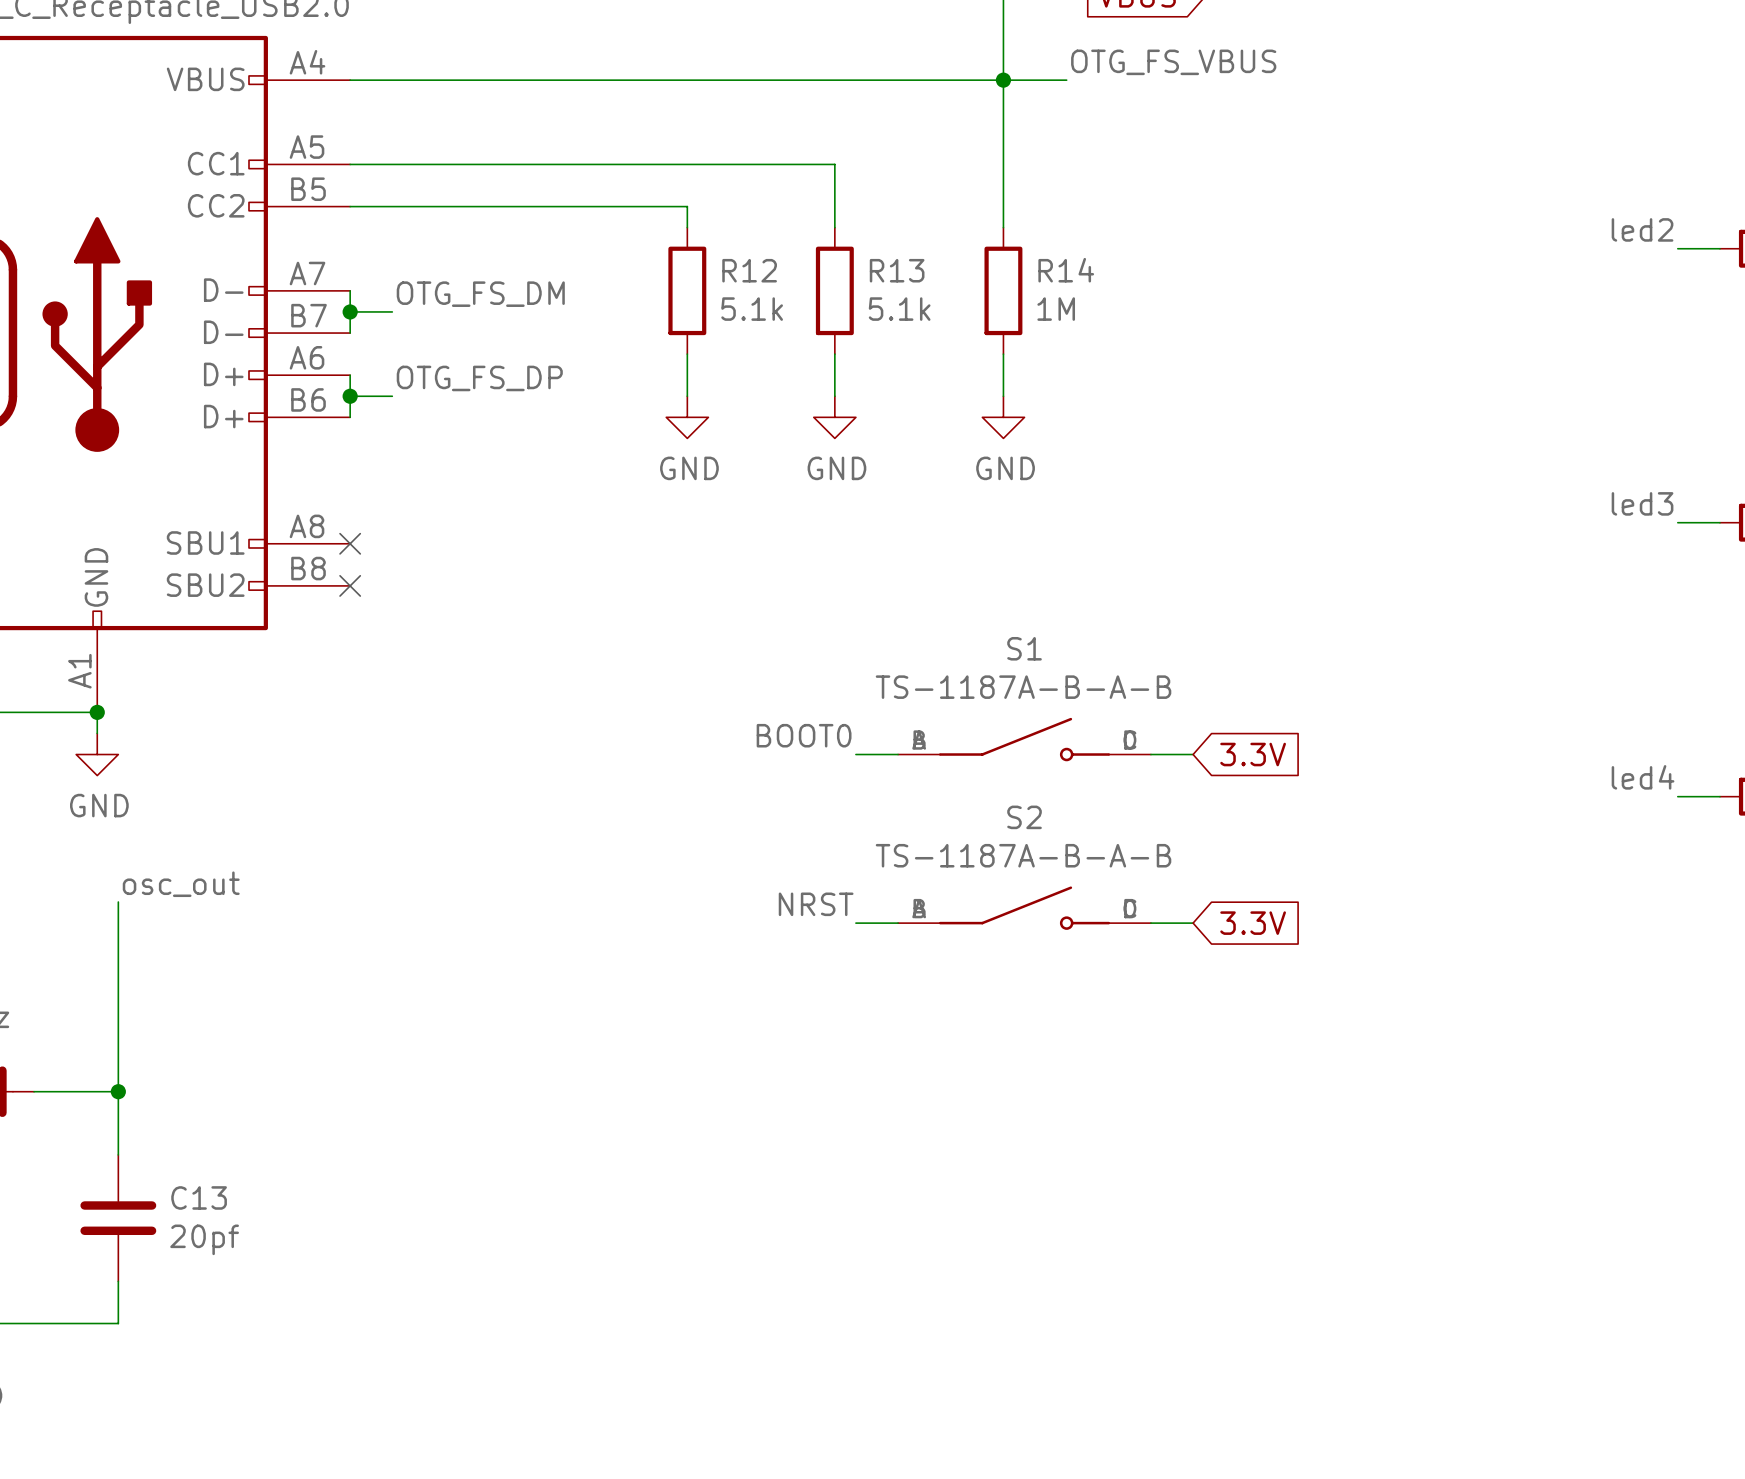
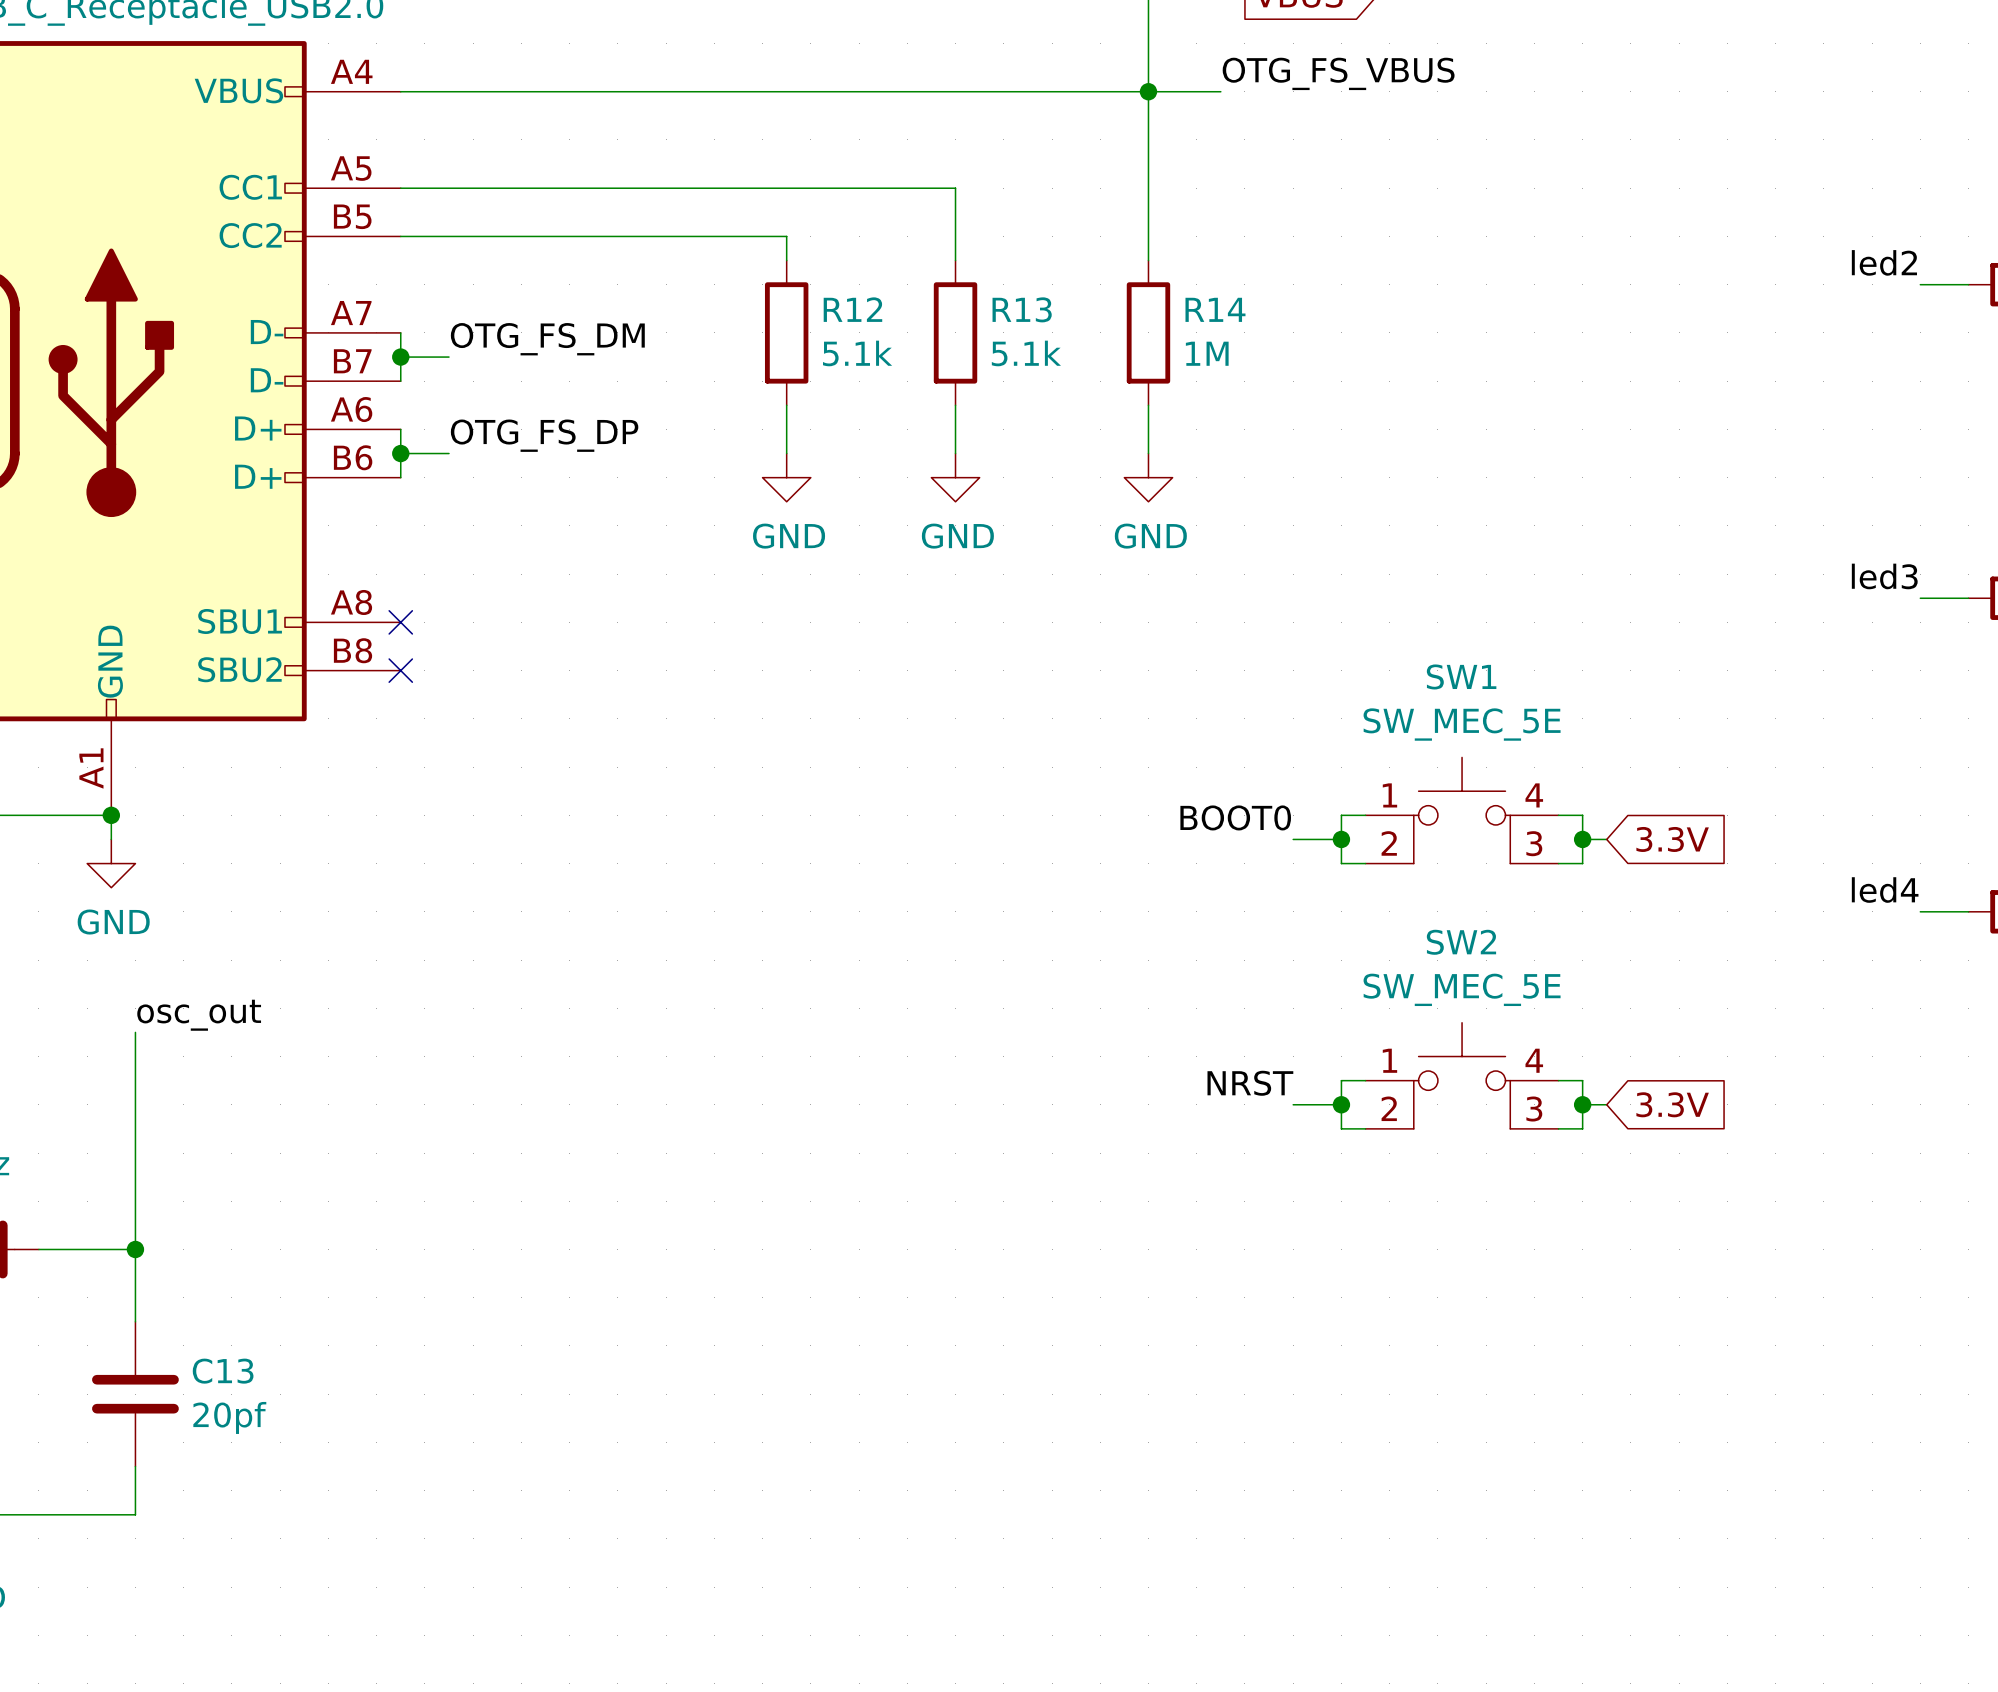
SW1: none -> SW_MEC_5E (1462, 810)
wire: none -> (1558, 815) (1582, 815) (1582, 863) (1558, 863)
junction: none -> (1341, 839)
wire: none -> (1582, 839) (1606, 839)
junction: none -> (1582, 839)
global label: none -> 3.3V (1672, 839)
label position: BOOT0 (804, 735) -> BOOT0 (1235, 817)
S1: TS-1187A-B-A-B (1024, 739) -> none
wire: (855, 754) (898, 754) -> (1293, 839) (1341, 839)
wire: (1150, 754) (1172, 754) -> (1365, 815) (1341, 815) (1341, 863)
global label: 3.3V (1253, 754) -> none
label position: NRST (816, 904) -> NRST (1250, 1083)
S2: TS-1187A-B-A-B (1024, 908) -> none
wire: (855, 923) (898, 923) -> none
wire: (1150, 923) (1193, 923) -> (1293, 1104) (1341, 1104)
global label: 3.3V (1253, 923) -> none
SW2: none -> SW_MEC_5E (1462, 1075)
wire: none -> (1365, 1080) (1341, 1080) (1341, 1128) (1365, 1128)
wire: none -> (1558, 1080) (1582, 1080) (1582, 1128) (1558, 1128)
junction: none -> (1341, 1104)
wire: none -> (1582, 1104) (1606, 1104)
junction: none -> (1582, 1104)
global label: none -> 3.3V (1672, 1104)

